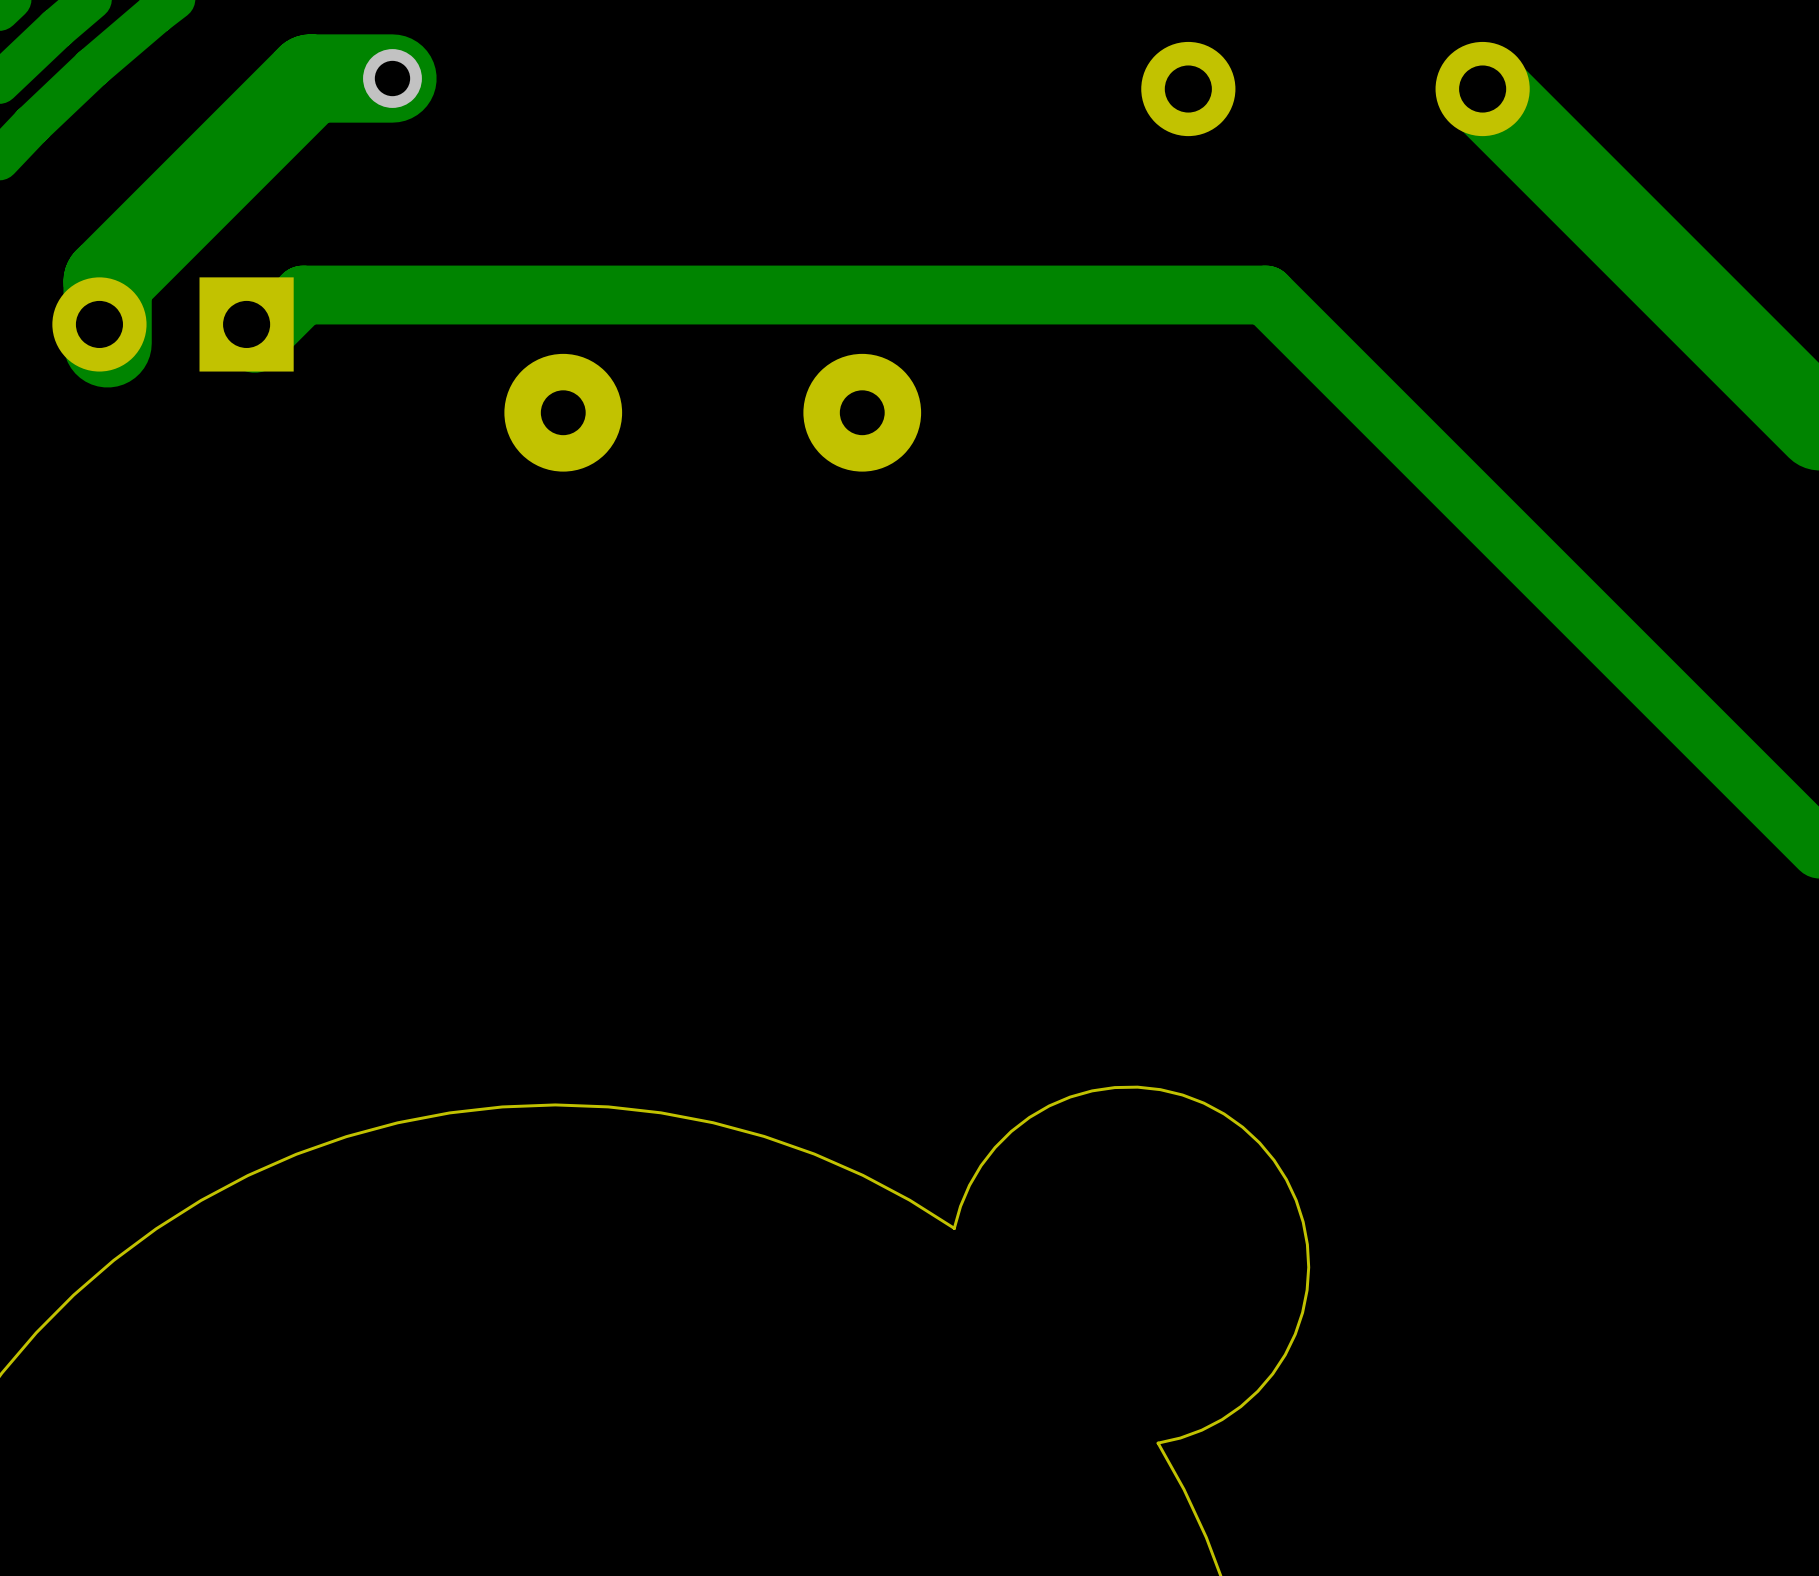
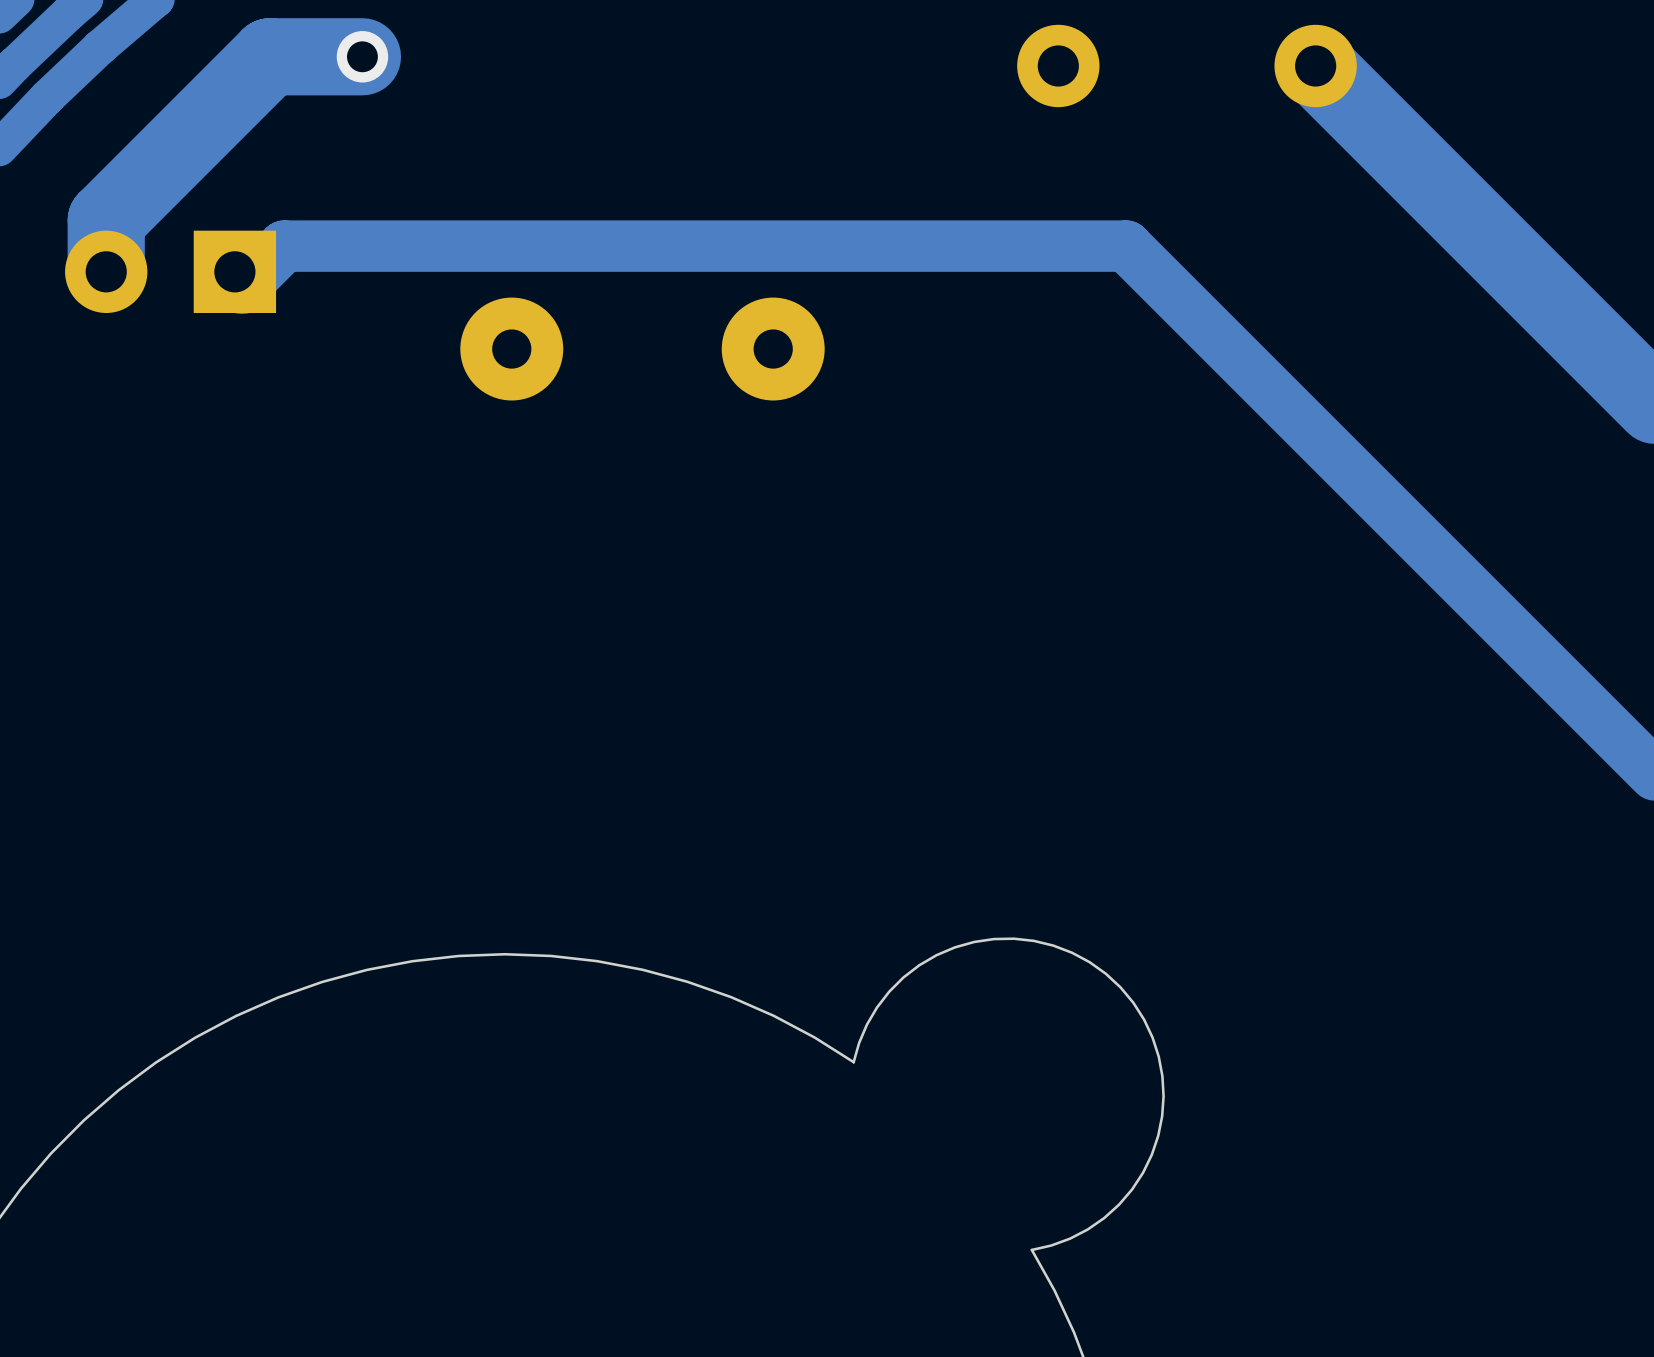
track: (310, 78) (107, 281) (107, 343) -> (290, 56) (269, 56) (106, 220) (106, 271)

